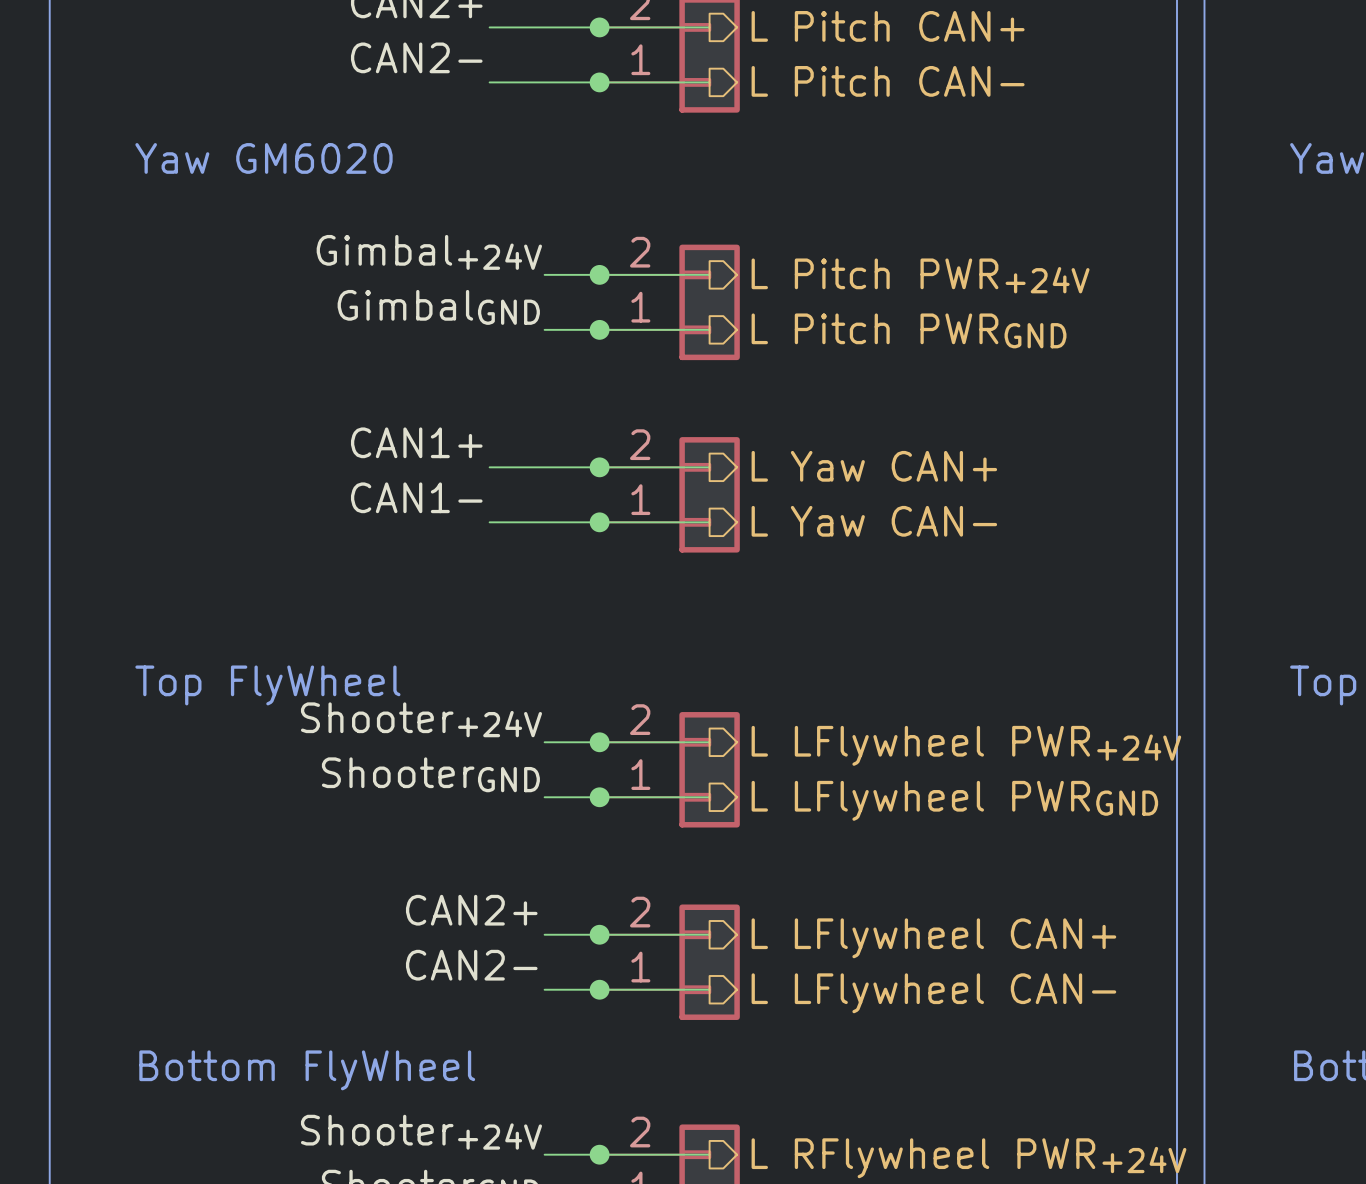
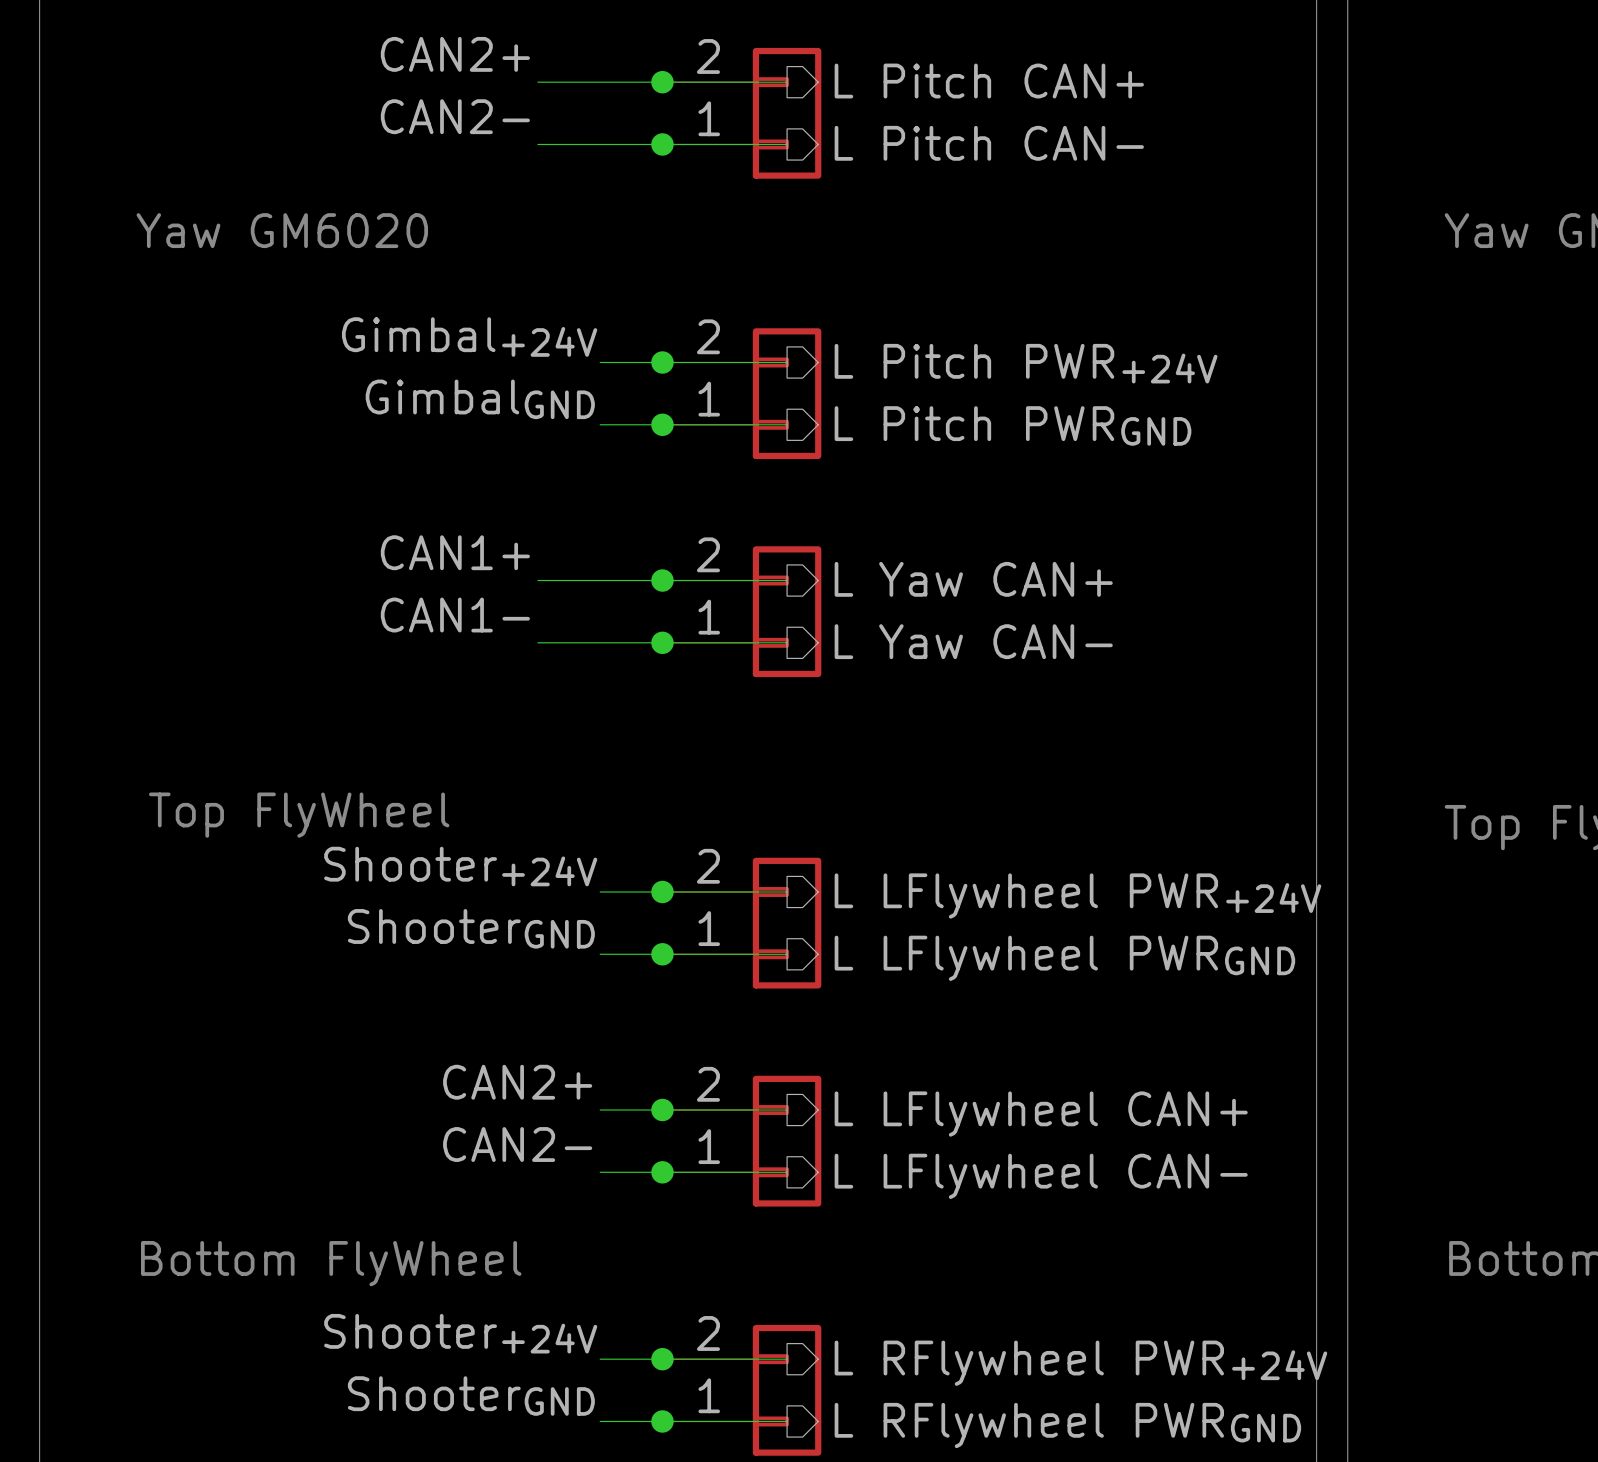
text position: Top FlyWheel (267, 685) -> Top FlyWheel (299, 815)

